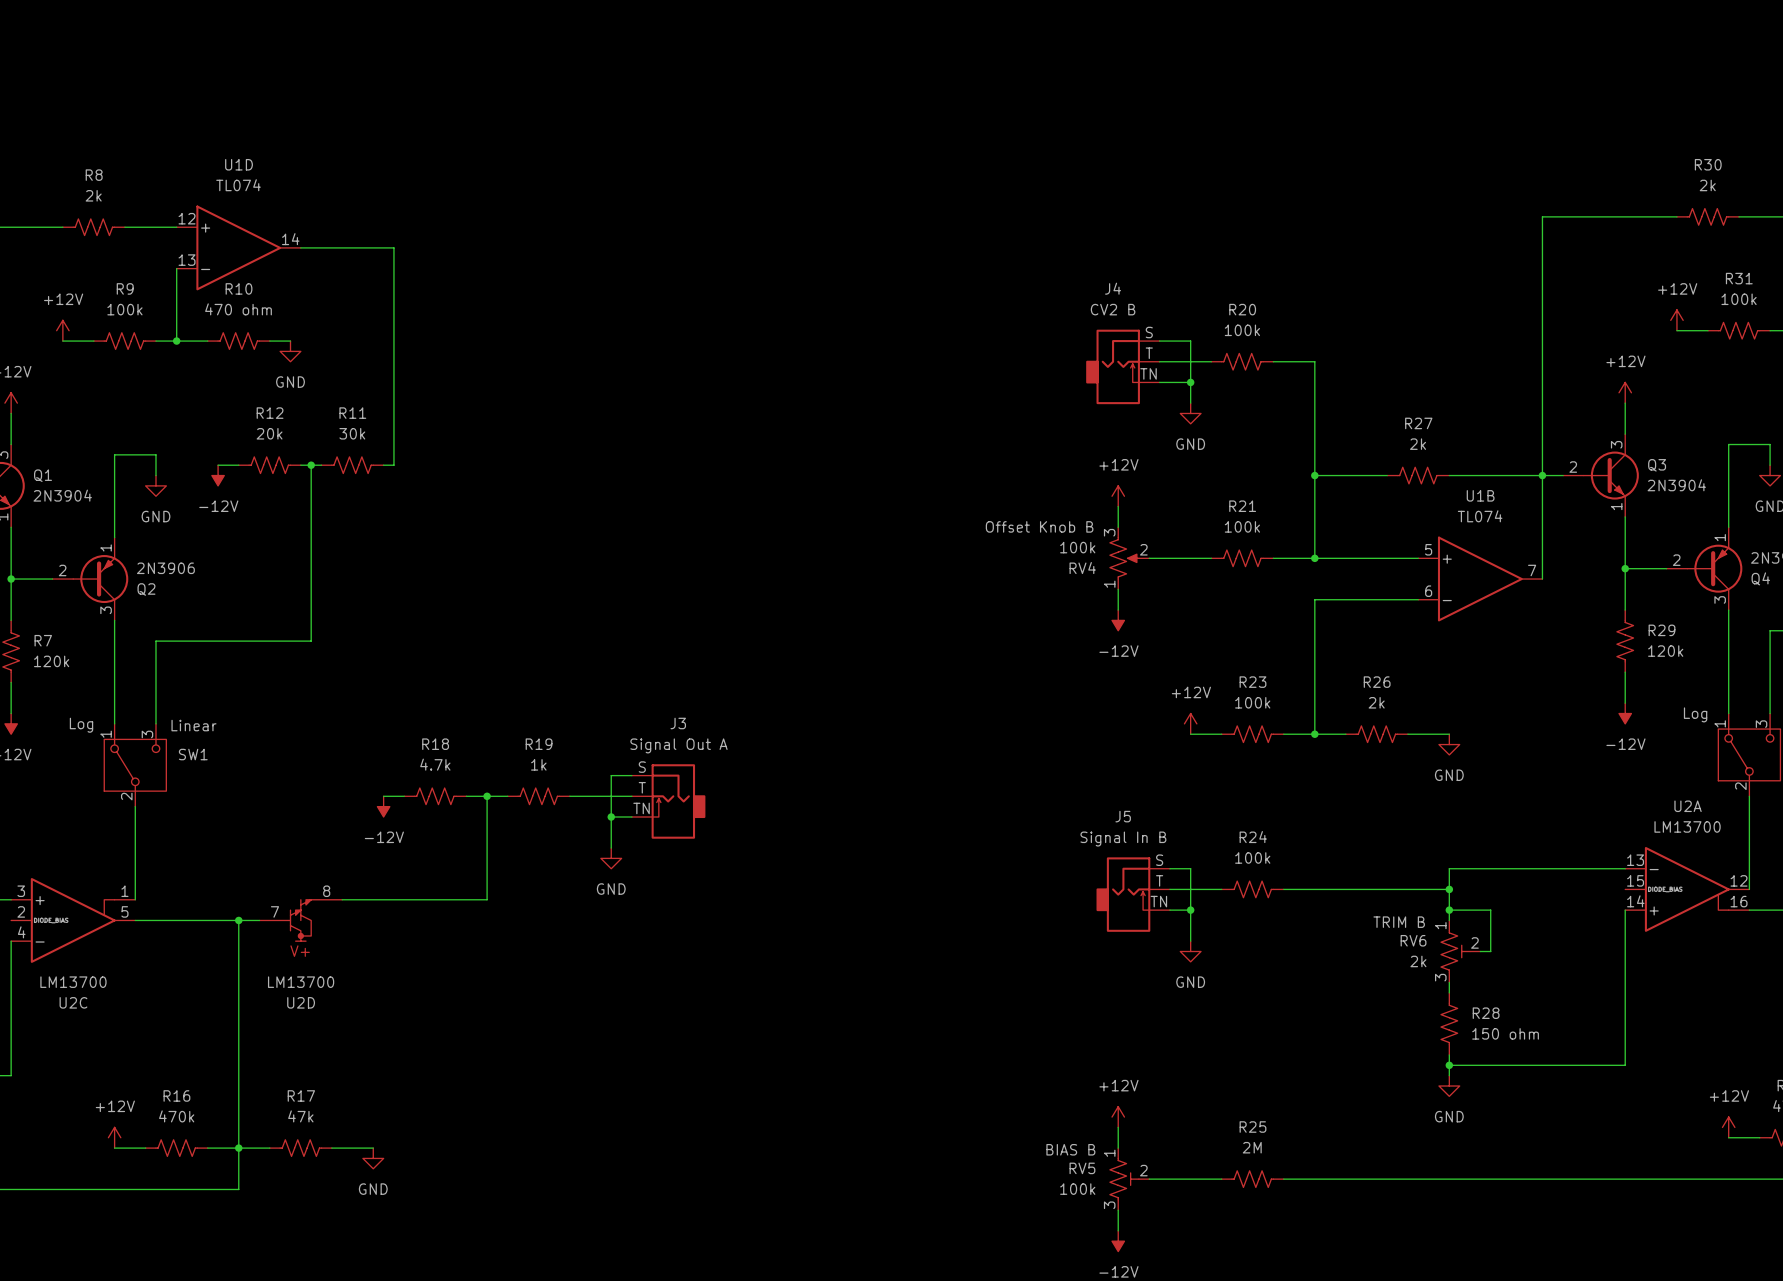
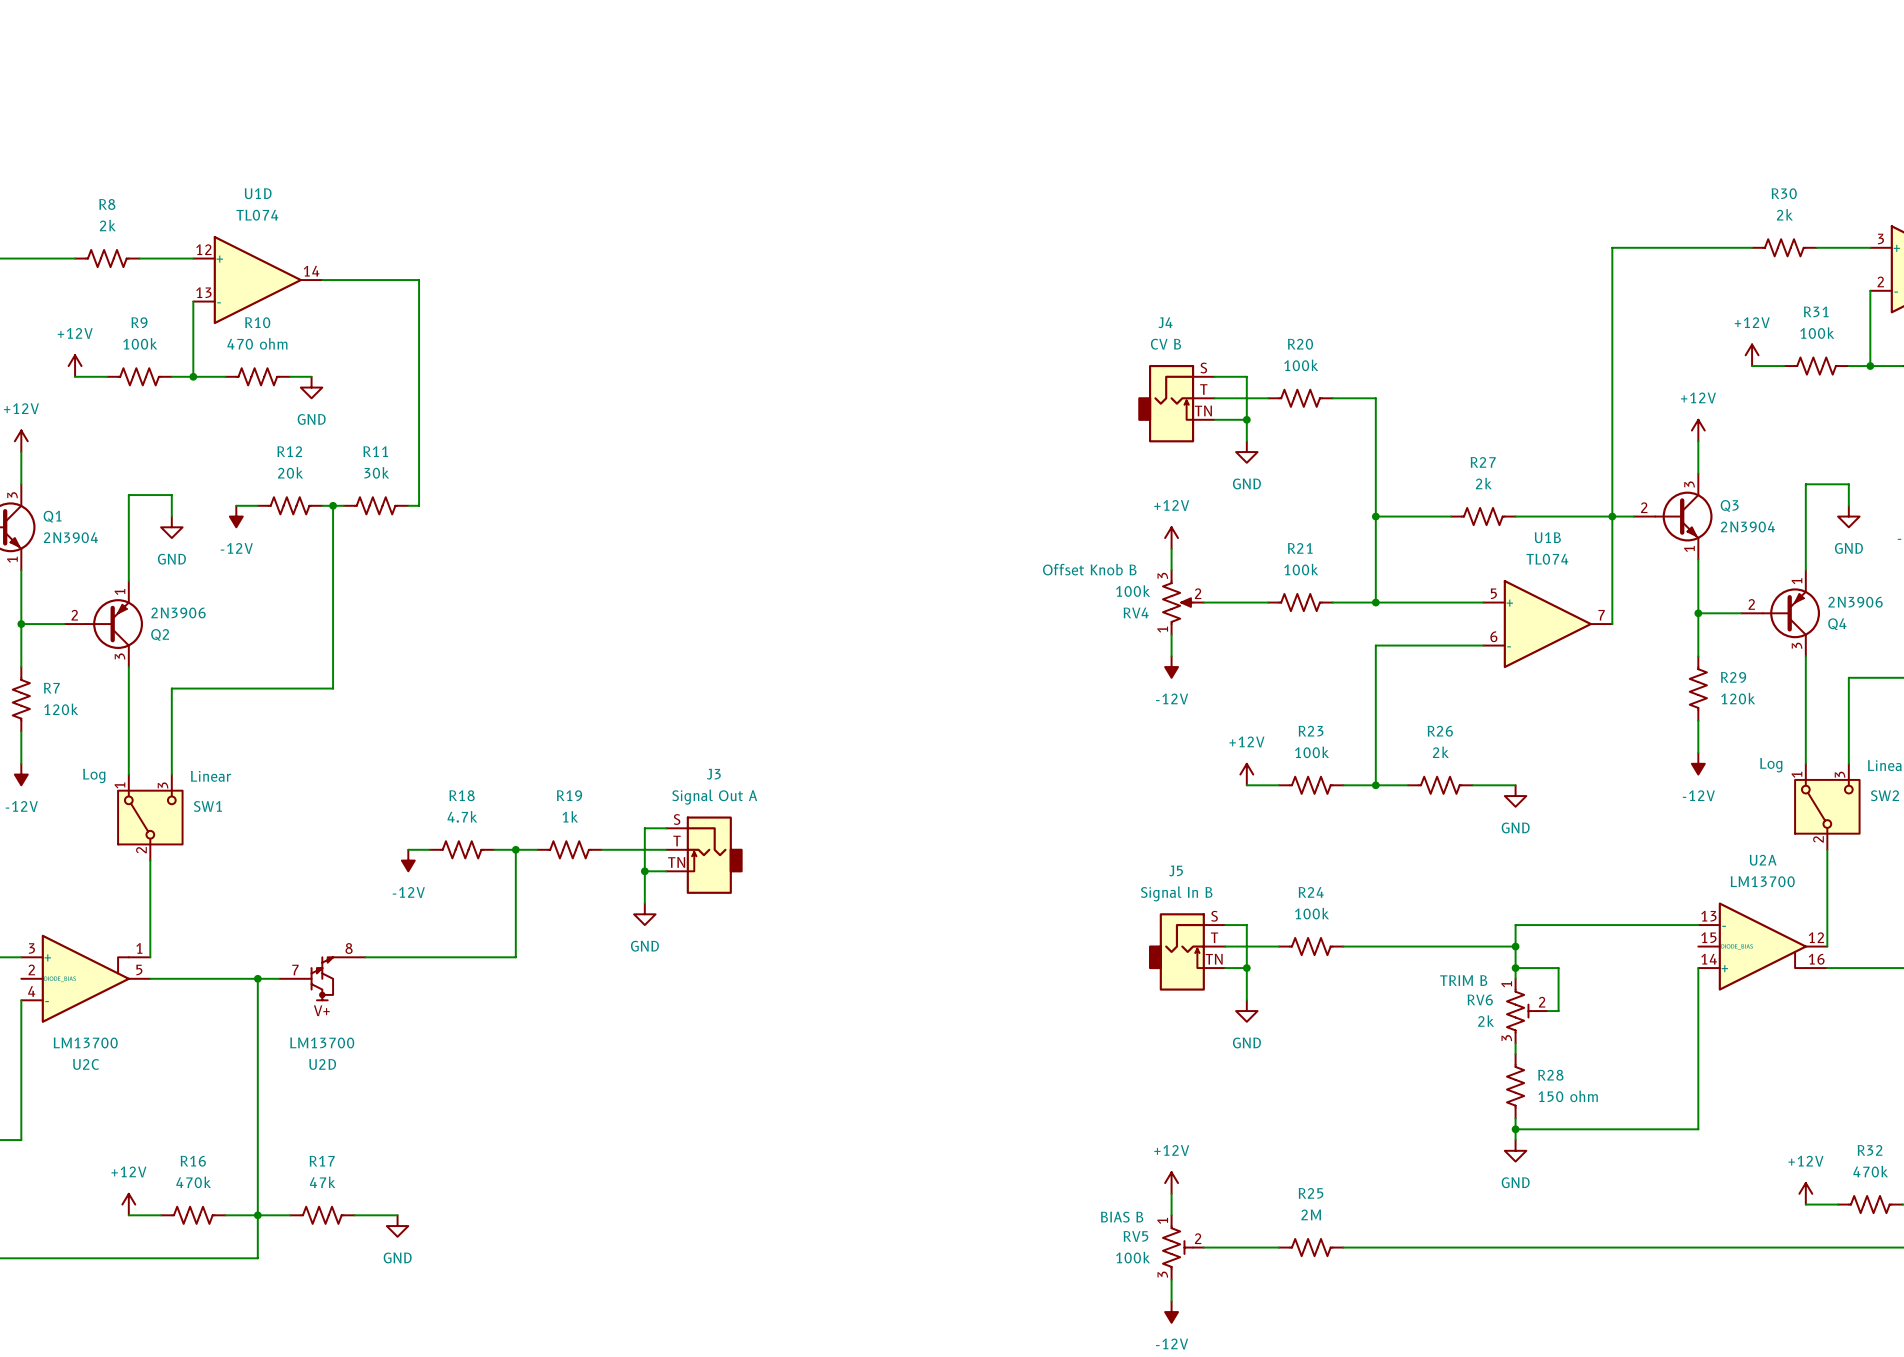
J4 value: CV2 B (1113, 309) -> CV B (1165, 344)

